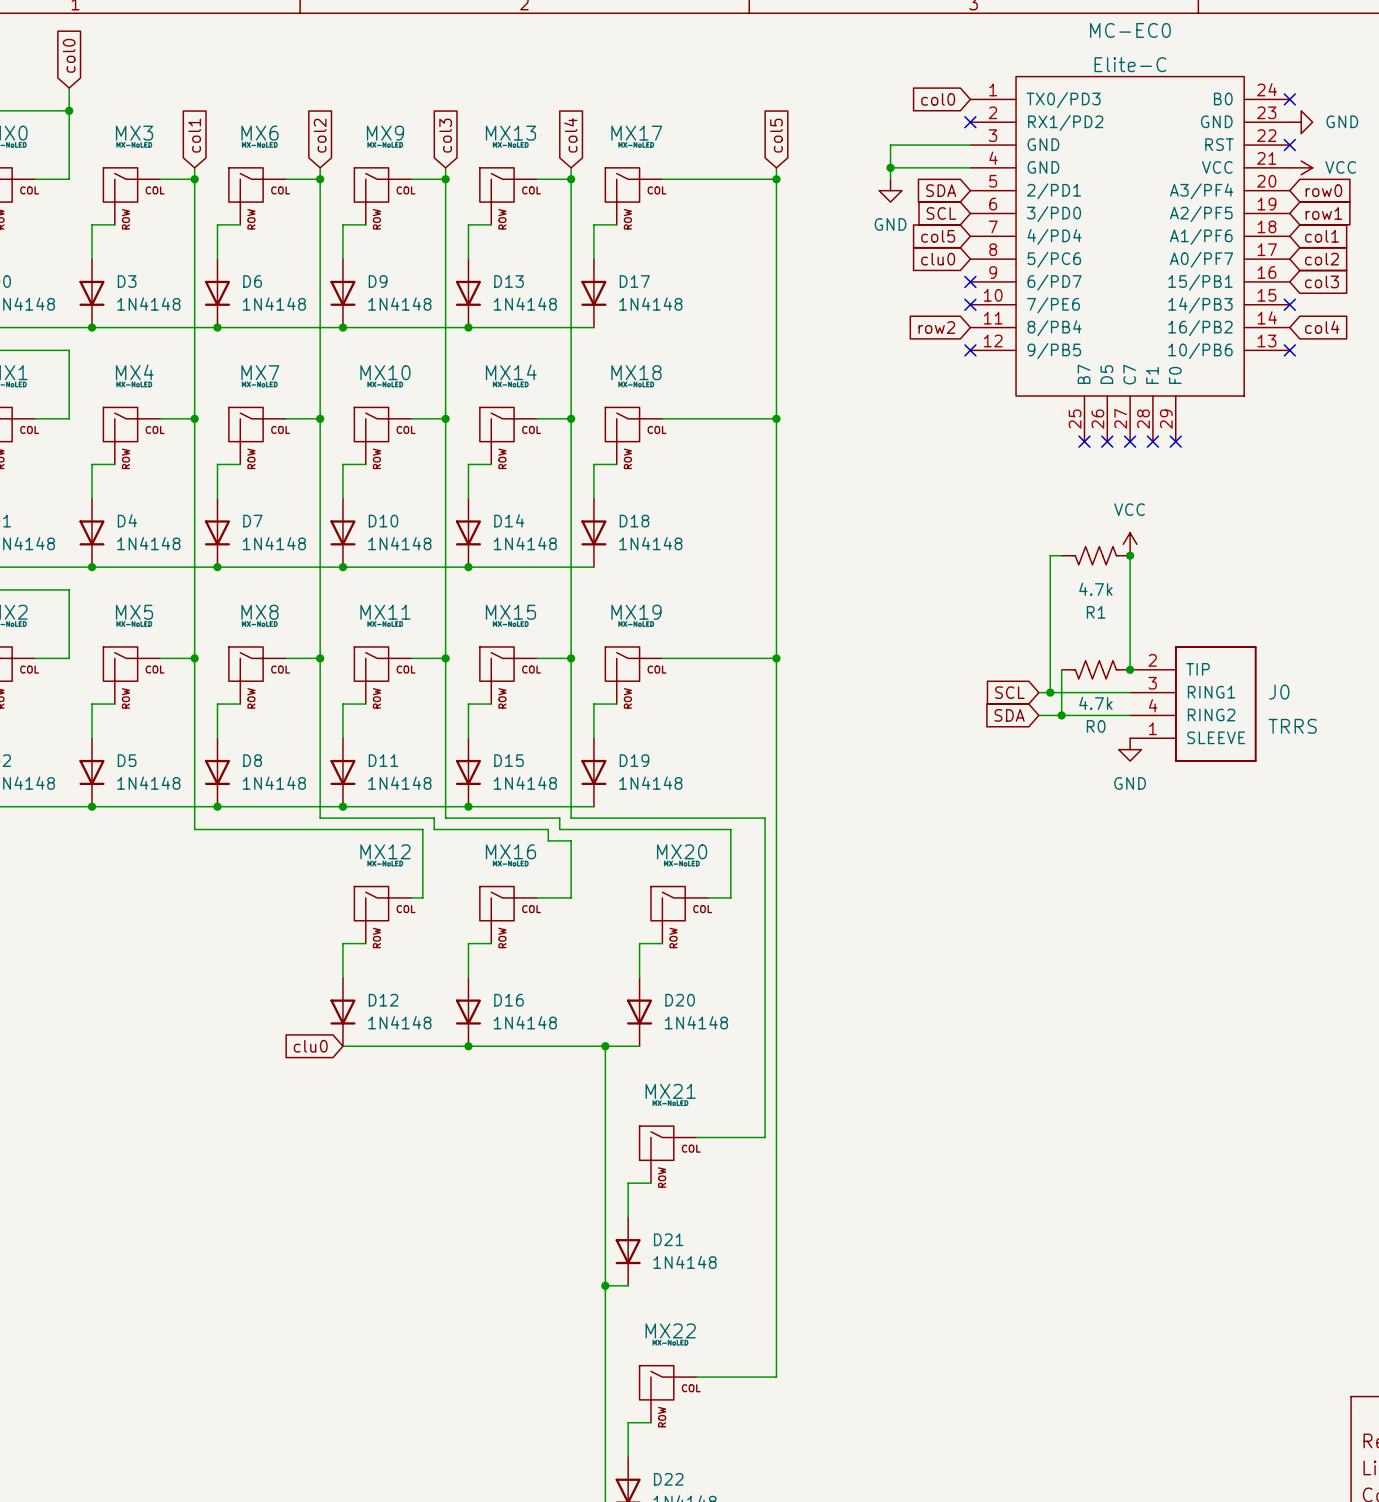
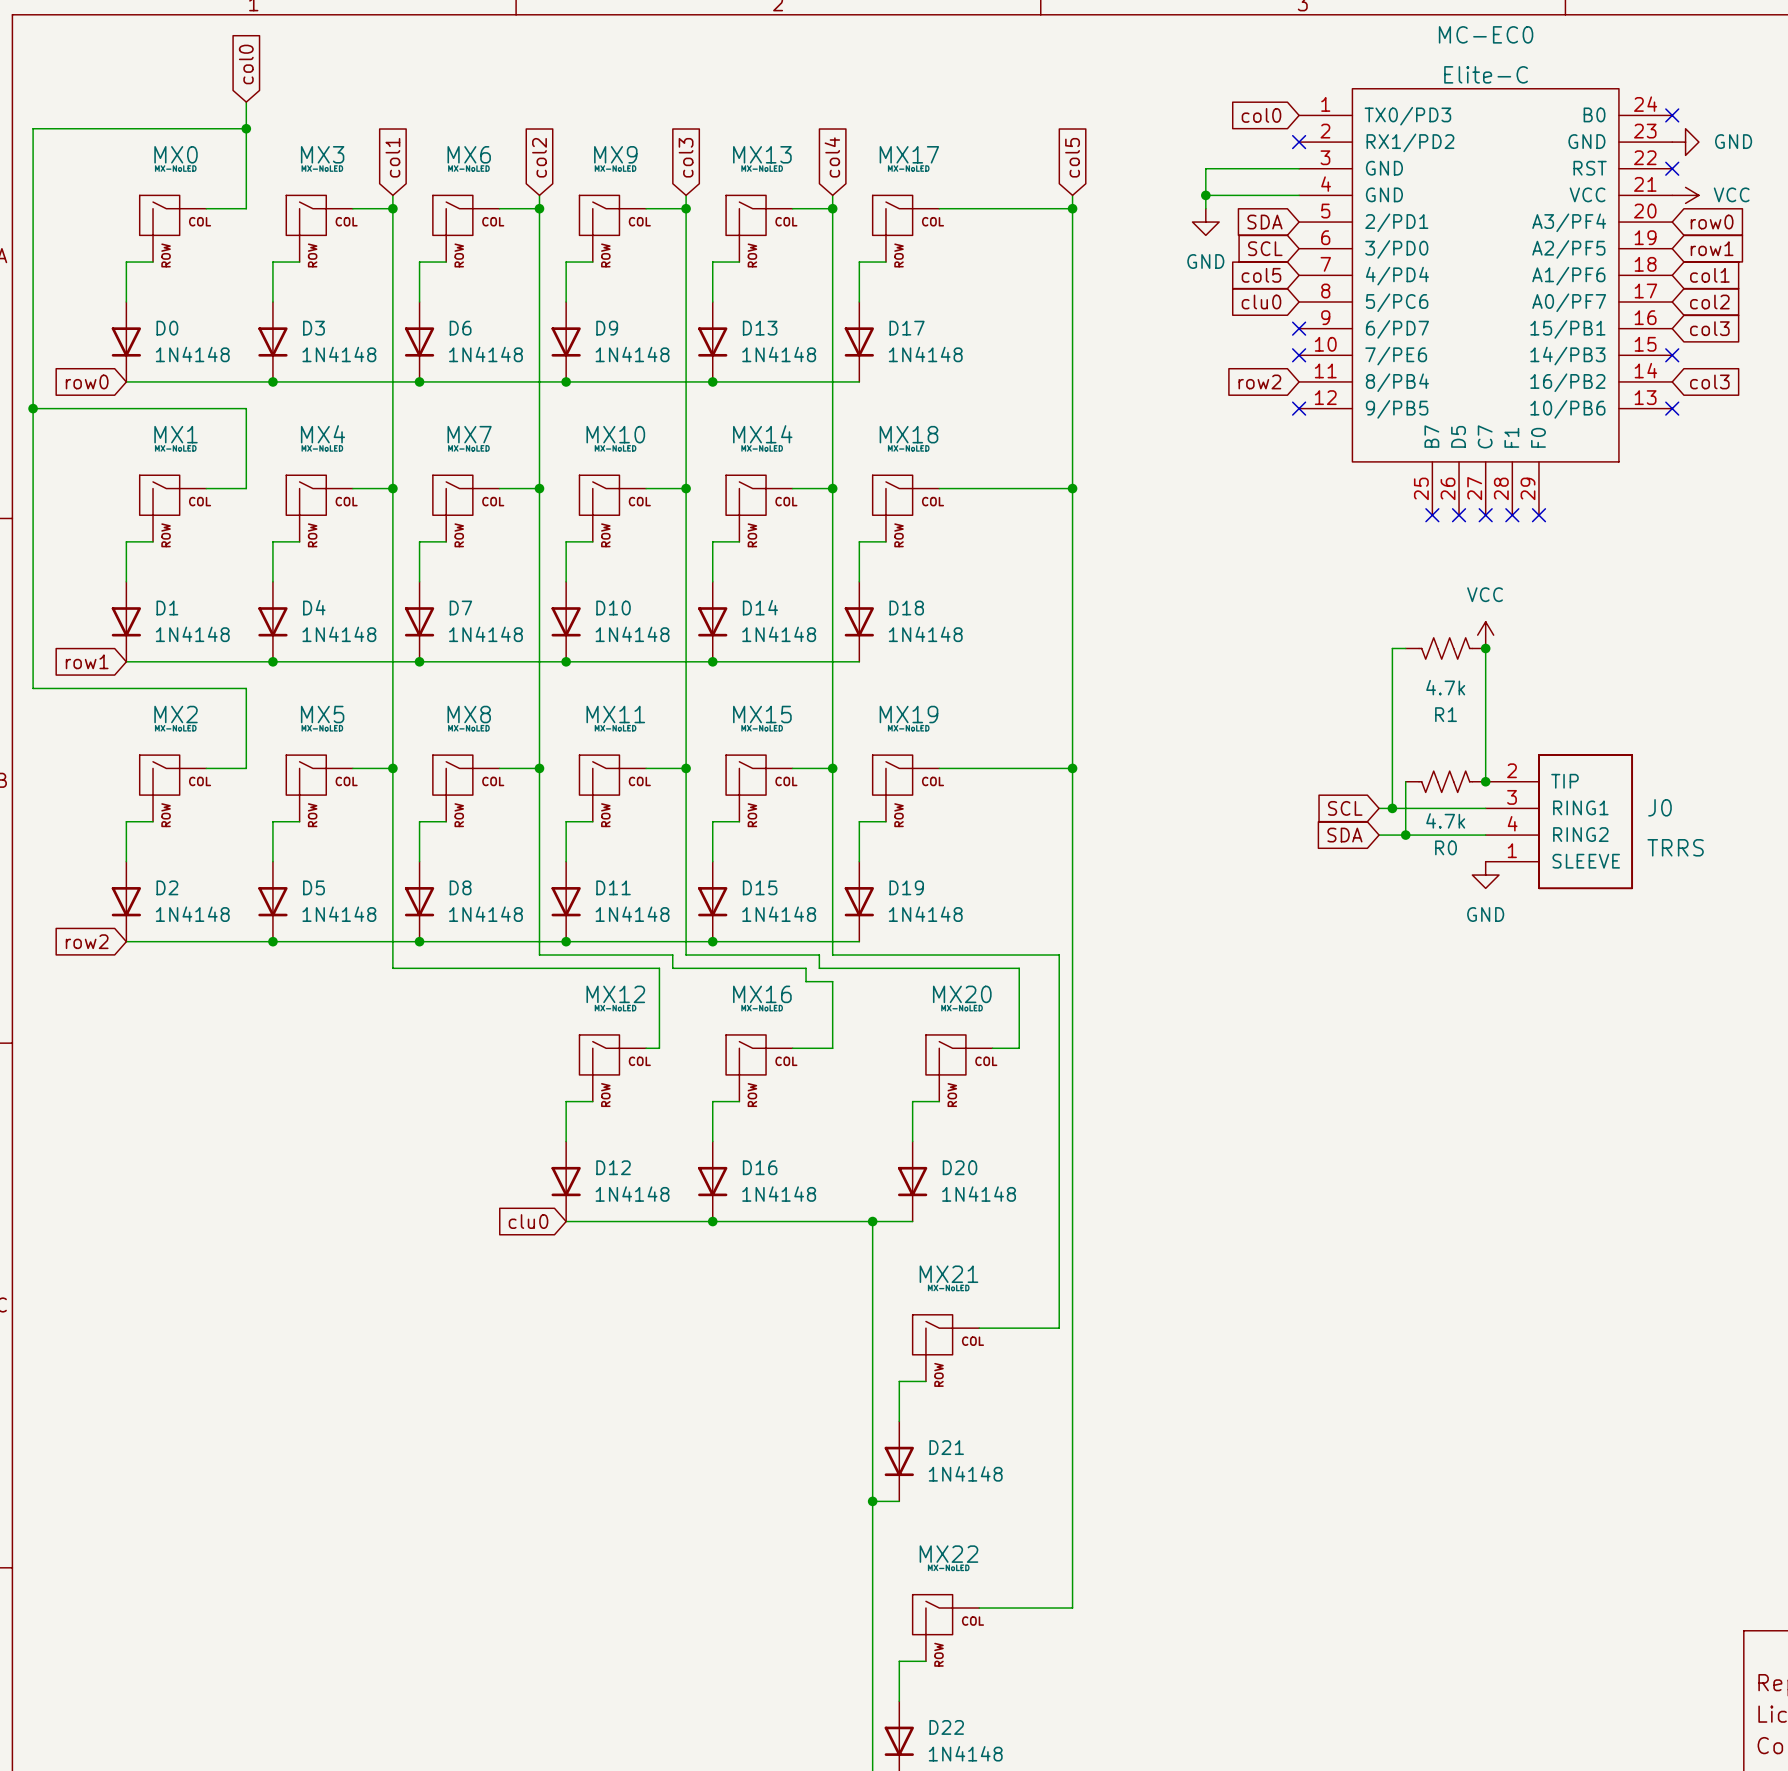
global label: col4 (1322, 327) -> col3 (1709, 381)

